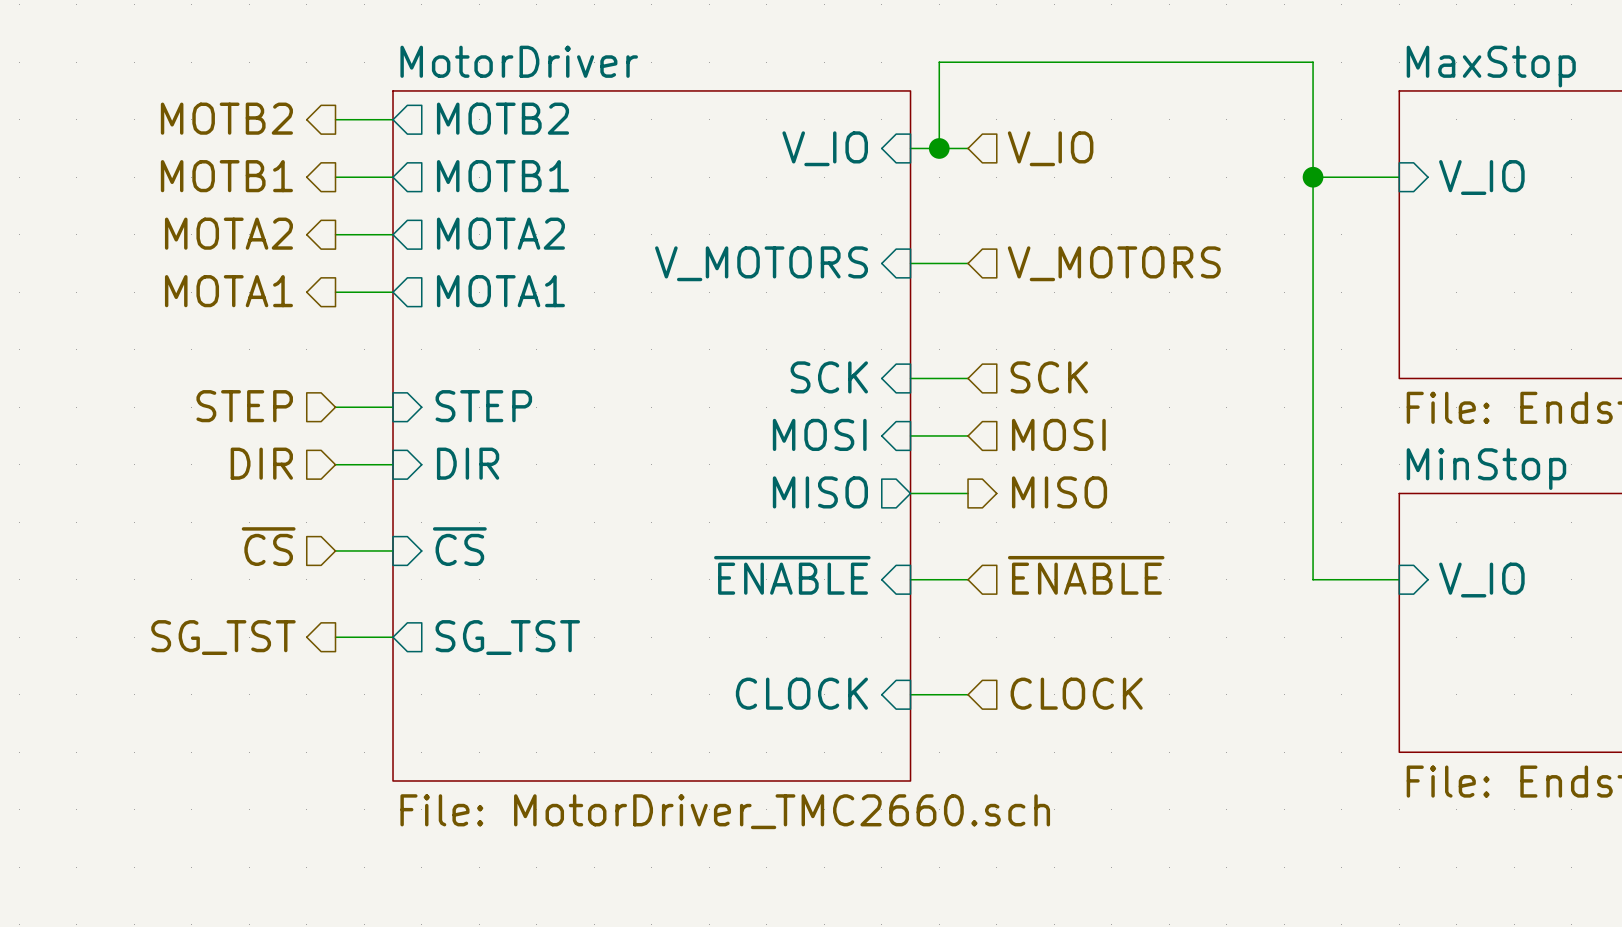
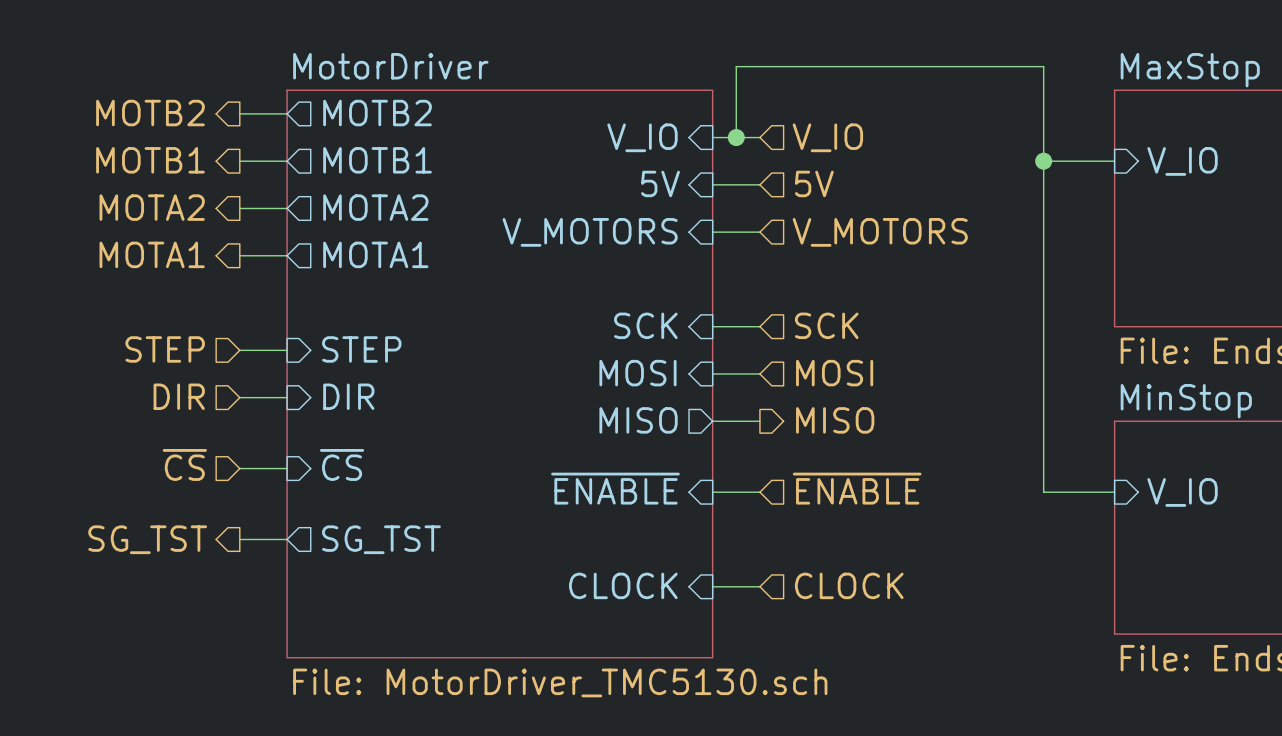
sheet pin: none -> 5V (660, 183)
hierarchical label: none -> 5V (814, 183)
wire: none -> (712, 184) (759, 184)
sheet MotorDriver value: File: MotorDriver_TMC2660.sch (725, 811) -> File: MotorDriver_TMC5130.sch (560, 682)

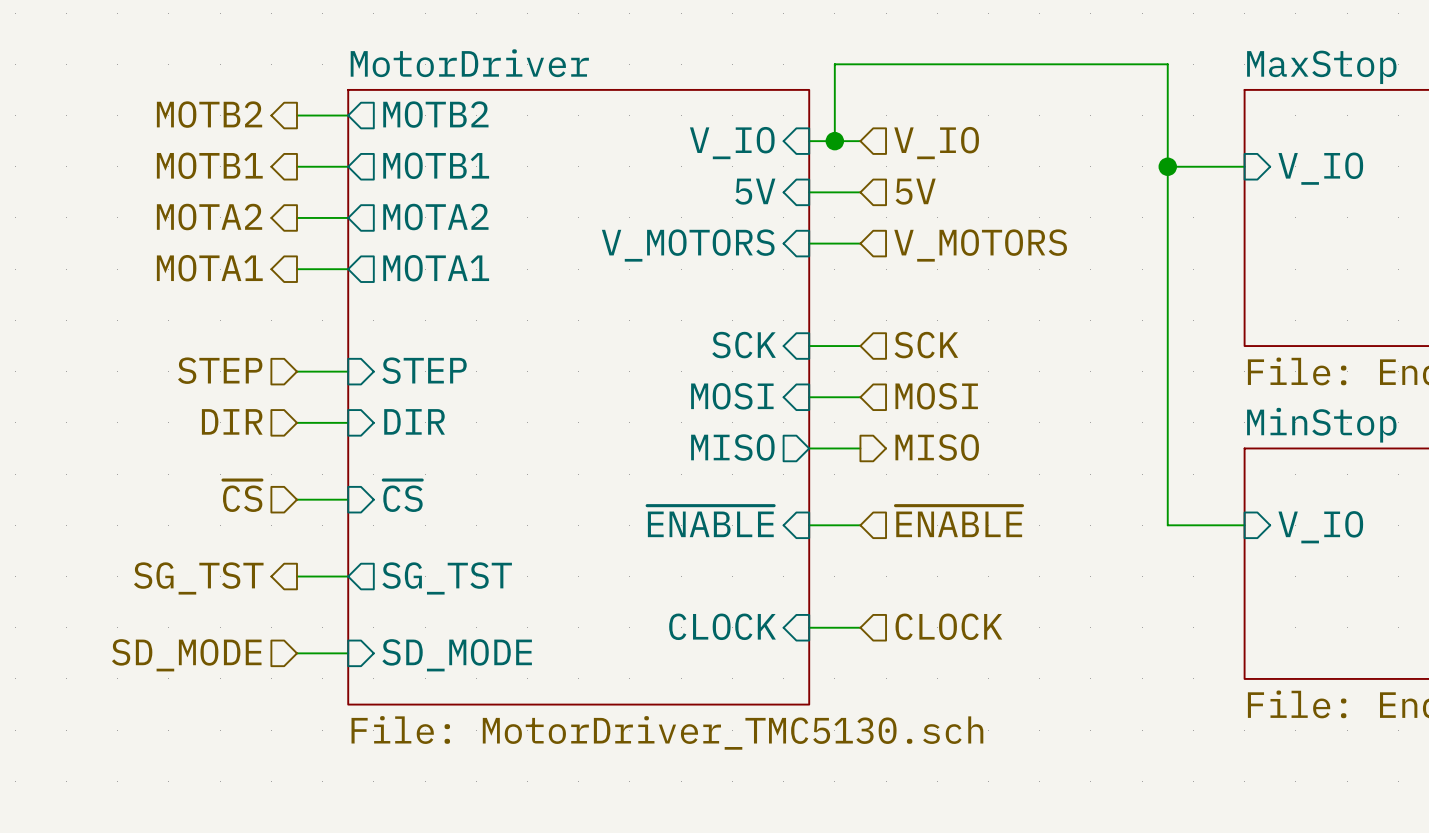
hierarchical label: none -> SD_MODE (186, 655)
wire: none -> (296, 653) (348, 653)
sheet pin: none -> SD_MODE (457, 655)

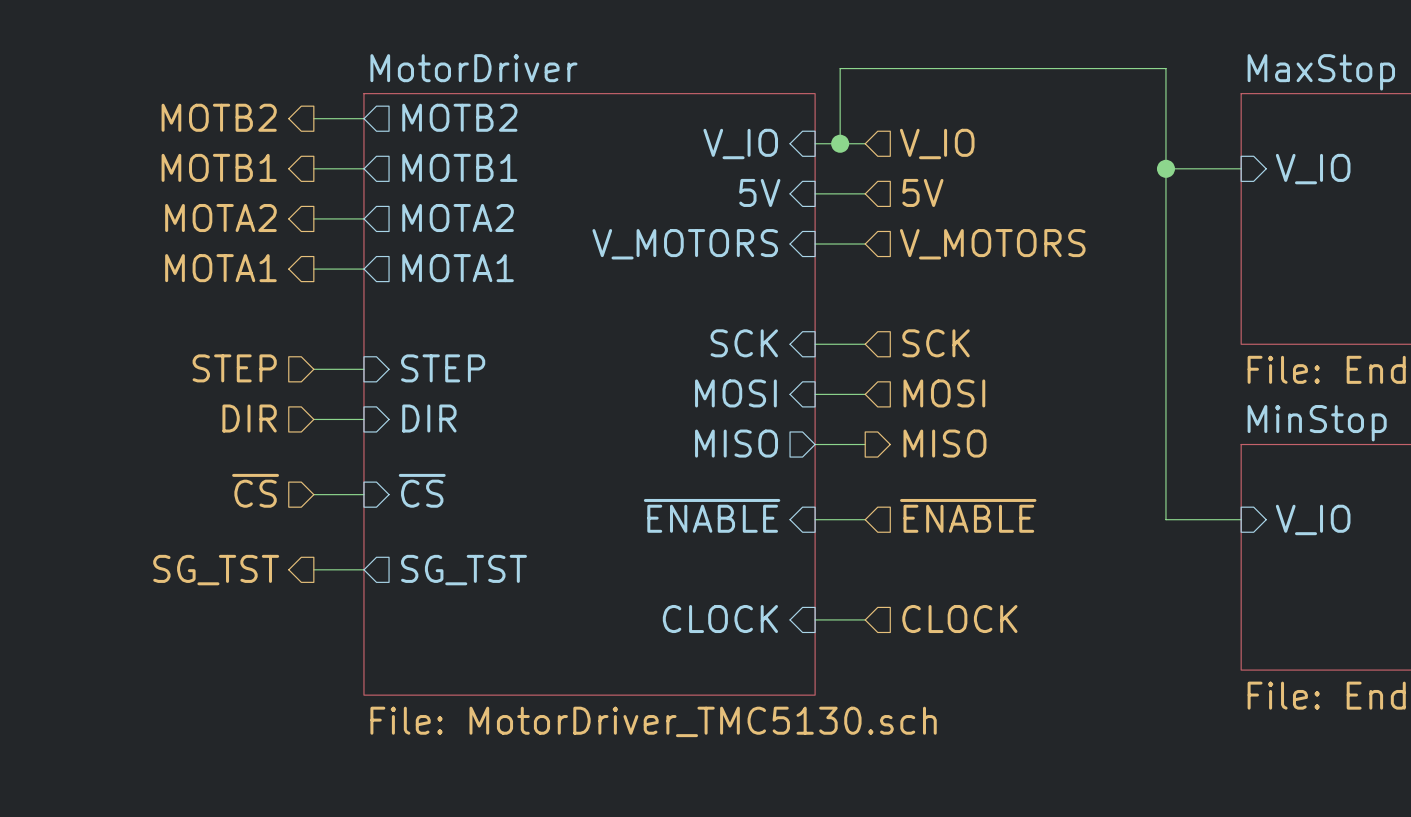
wire: (296, 653) (348, 653) -> none
hierarchical label: SD_MODE (186, 655) -> none
sheet pin: SD_MODE (457, 655) -> none

